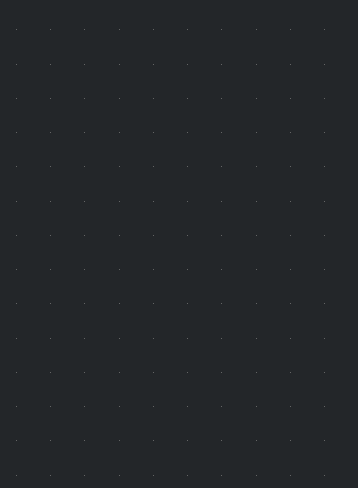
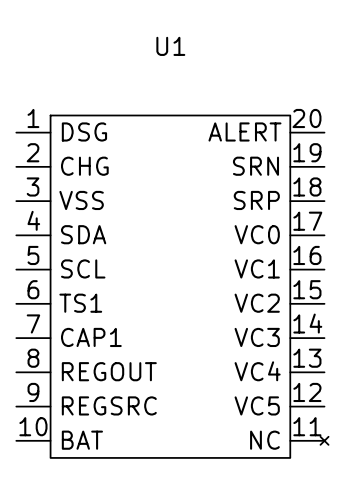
U1: none -> (172, 286)

